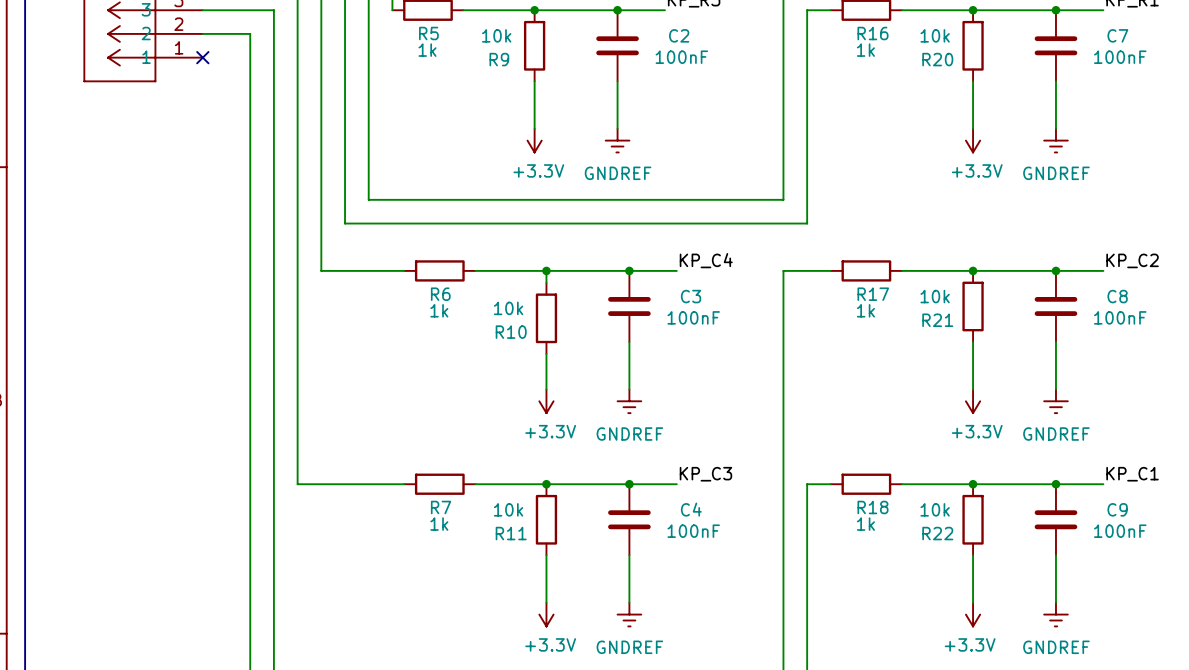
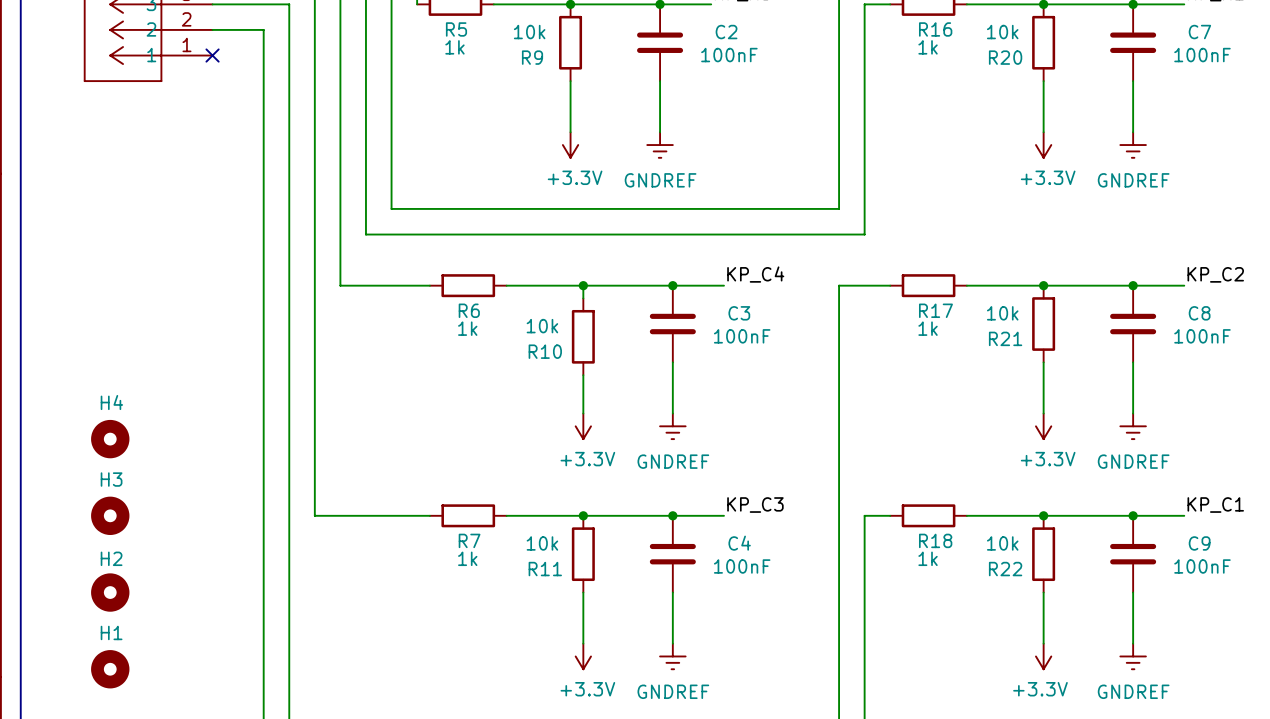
H4: none -> (110, 439)
H3: none -> (110, 515)
H2: none -> (110, 592)
H1: none -> (110, 669)

